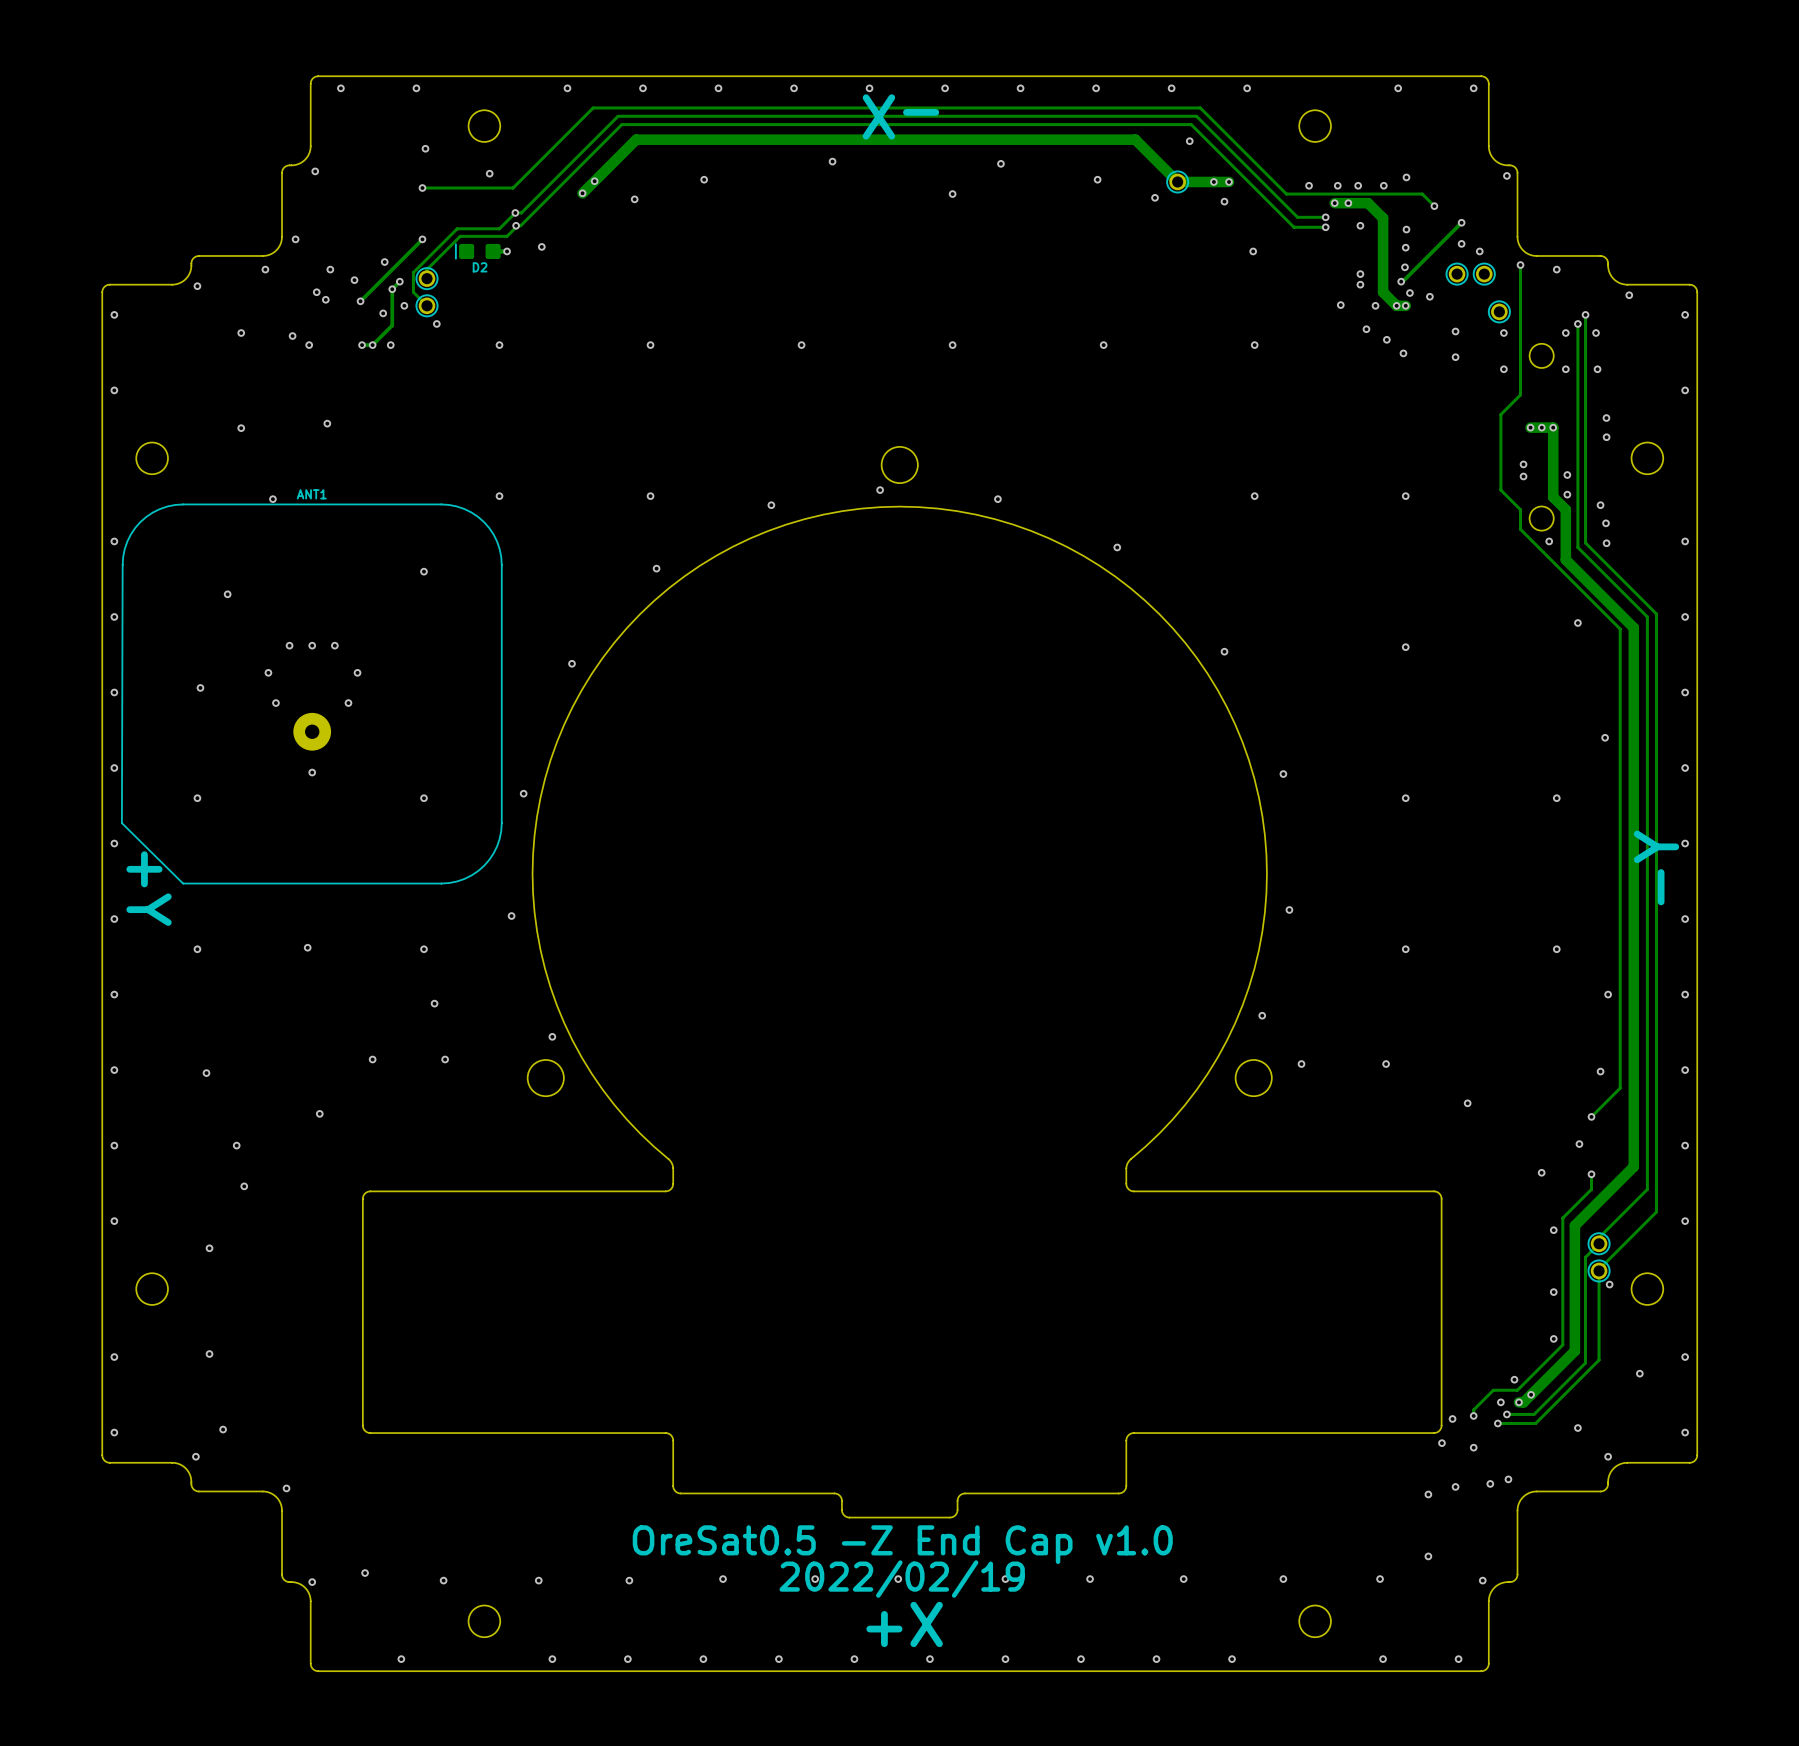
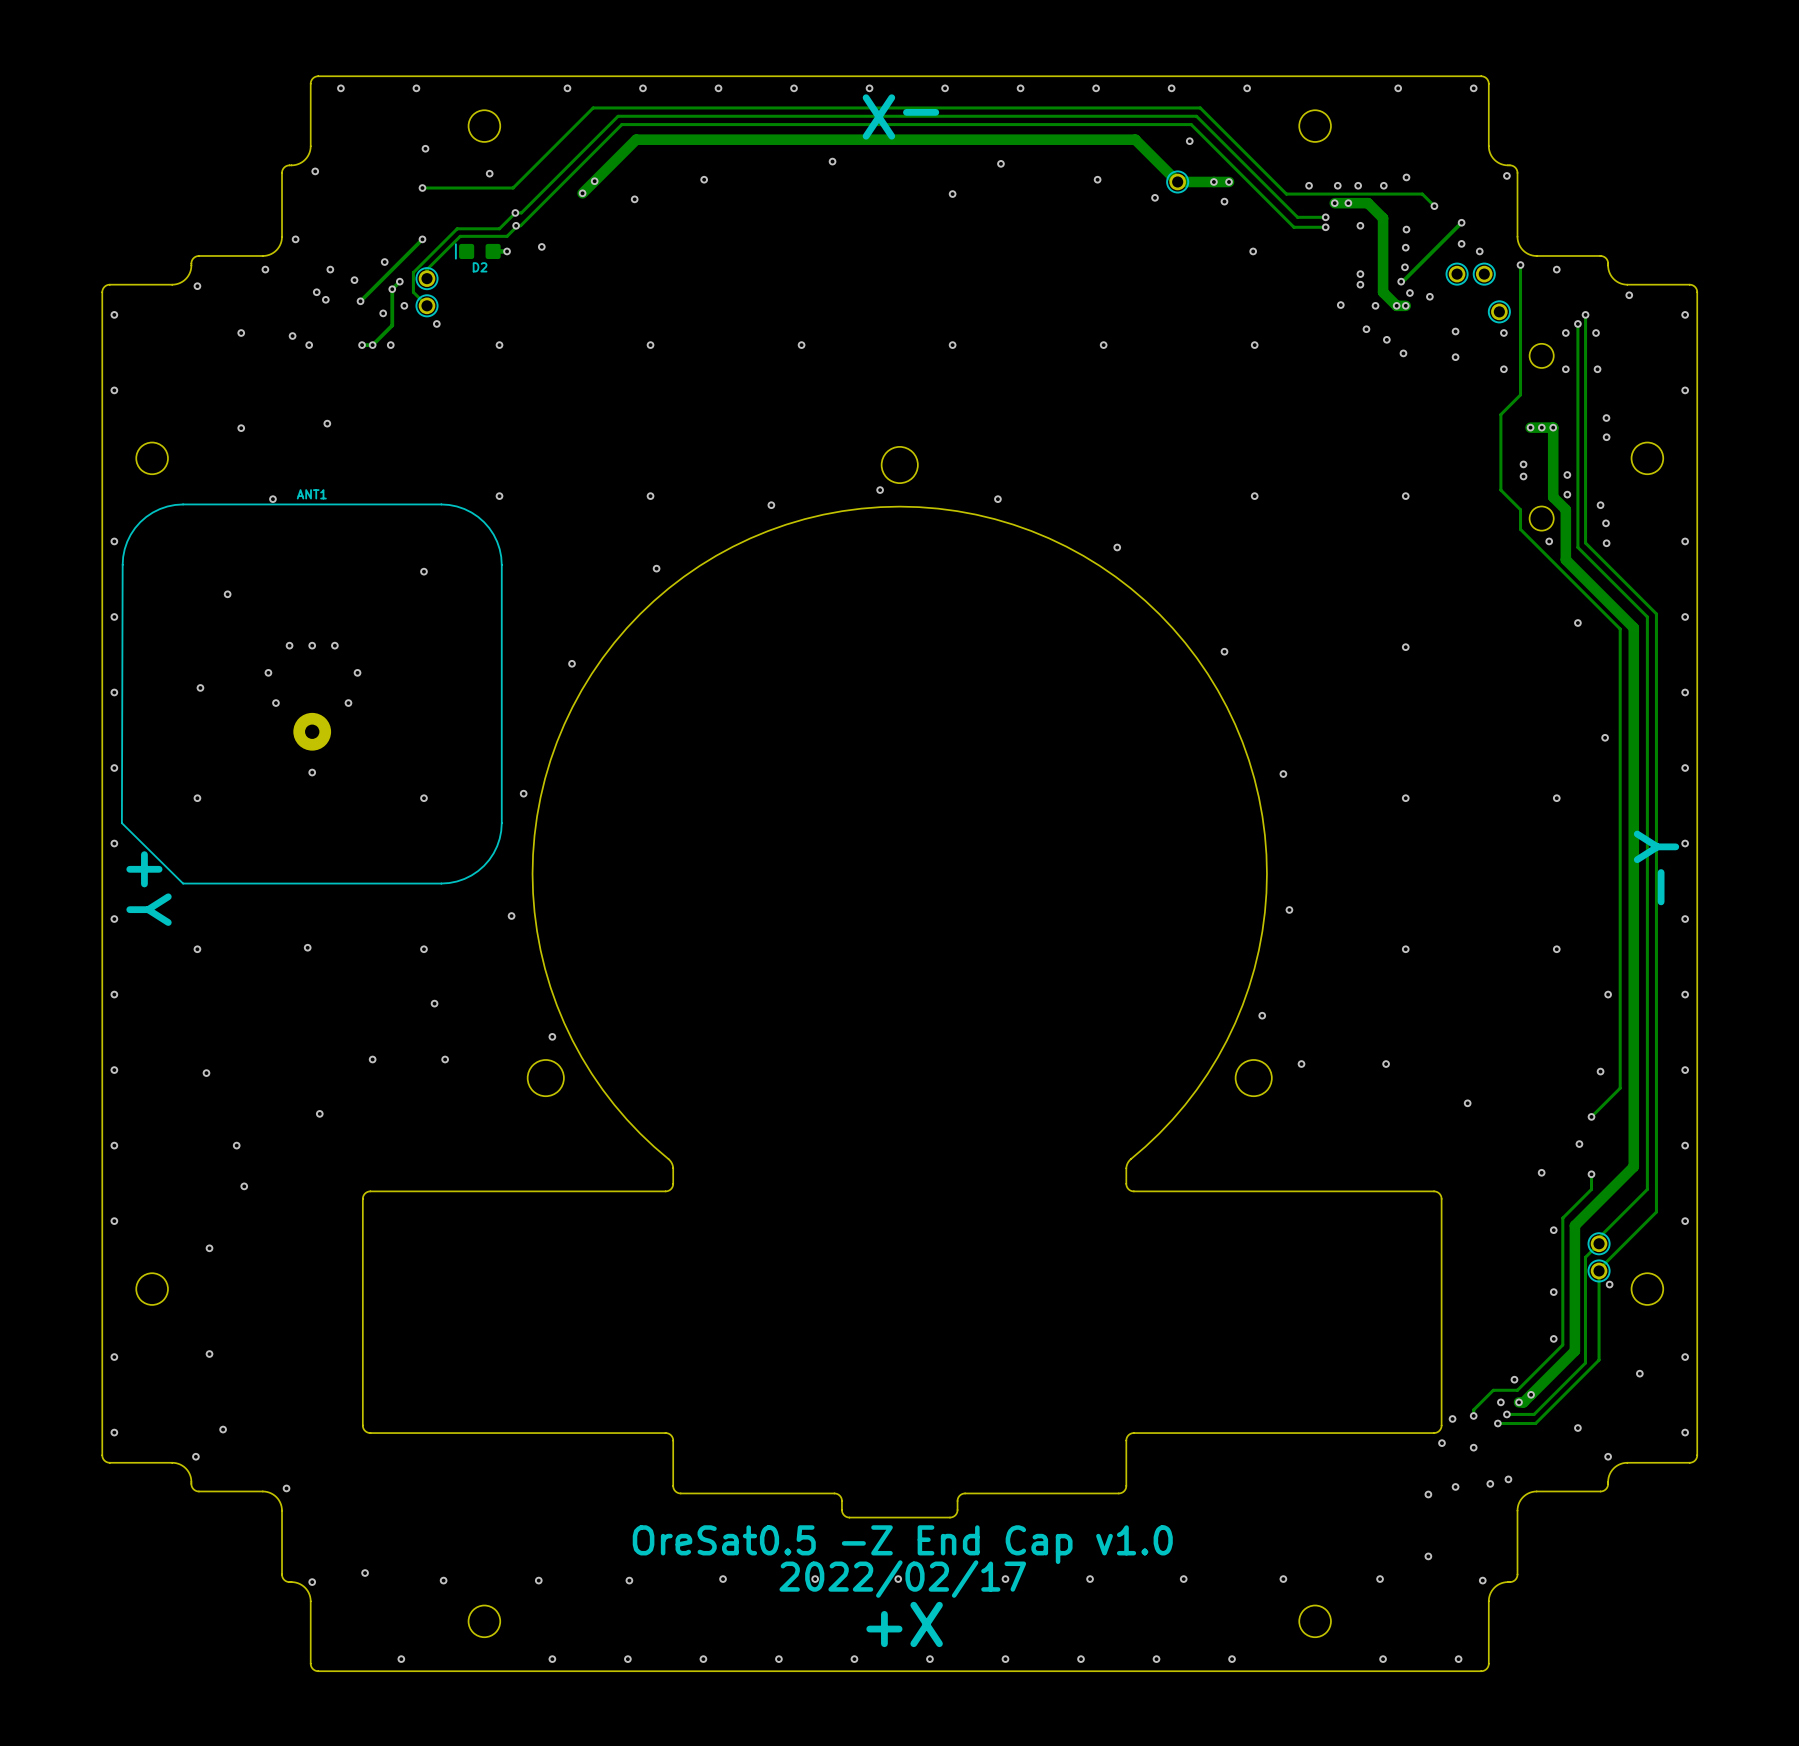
text: 2022/02/19 (902, 1579) -> 2022/02/17 (902, 1579)

